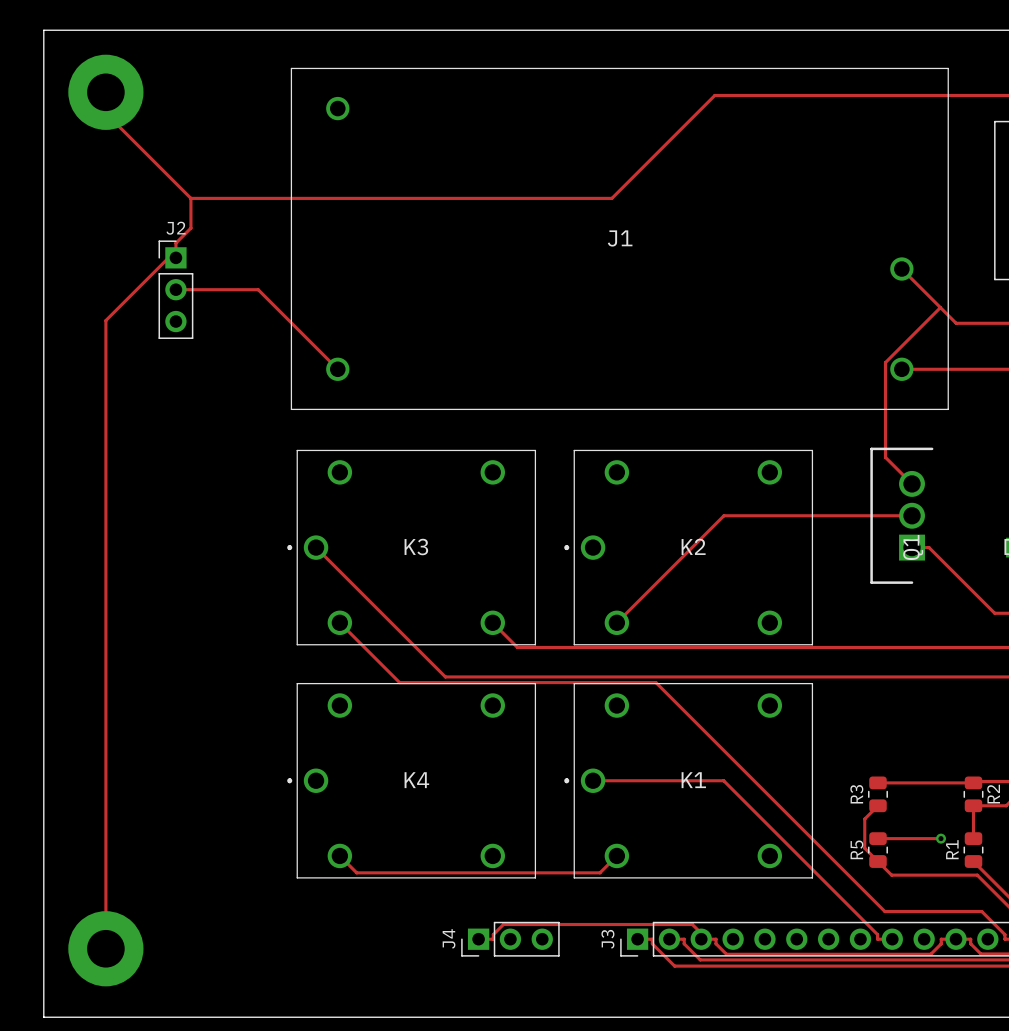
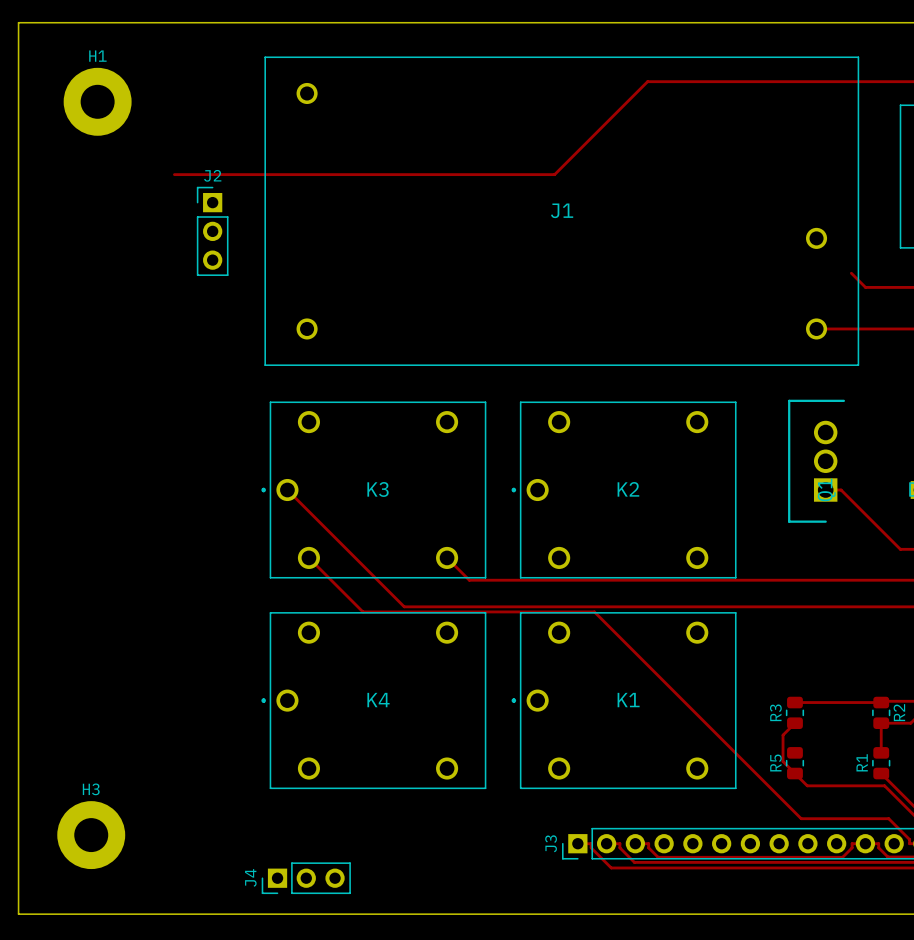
board edge: (43, 30) (43, 1017) -> (41, 22) (18, 22) (18, 914) (41, 914)
track: (105, 92) (105, 113) (190, 198) (190, 228) (175, 243) (175, 257) -> none
part: (105, 92) -> none
H1: none -> (97, 101)
track: (175, 250) (105, 320) (105, 948) -> none
track: (901, 269) (940, 307) (885, 362) (885, 457) (912, 483) -> none
track: (175, 289) (258, 289) (337, 369) -> none
J2 position: (175, 289) -> (212, 231)
track: (912, 515) (723, 515) (616, 622) -> none
track: (593, 780) (723, 780) (877, 934) (877, 939) (892, 939) -> none
track: (877, 838) (941, 838) -> none
via: (941, 838) -> none
track: (339, 855) (356, 872) (599, 872) (616, 855) -> none
H3: none -> (91, 835)
track: (478, 939) (493, 939) (493, 934) (503, 924) (692, 924) (707, 939) -> none
J4 position: (510, 939) -> (306, 878)
part: (105, 948) -> none

